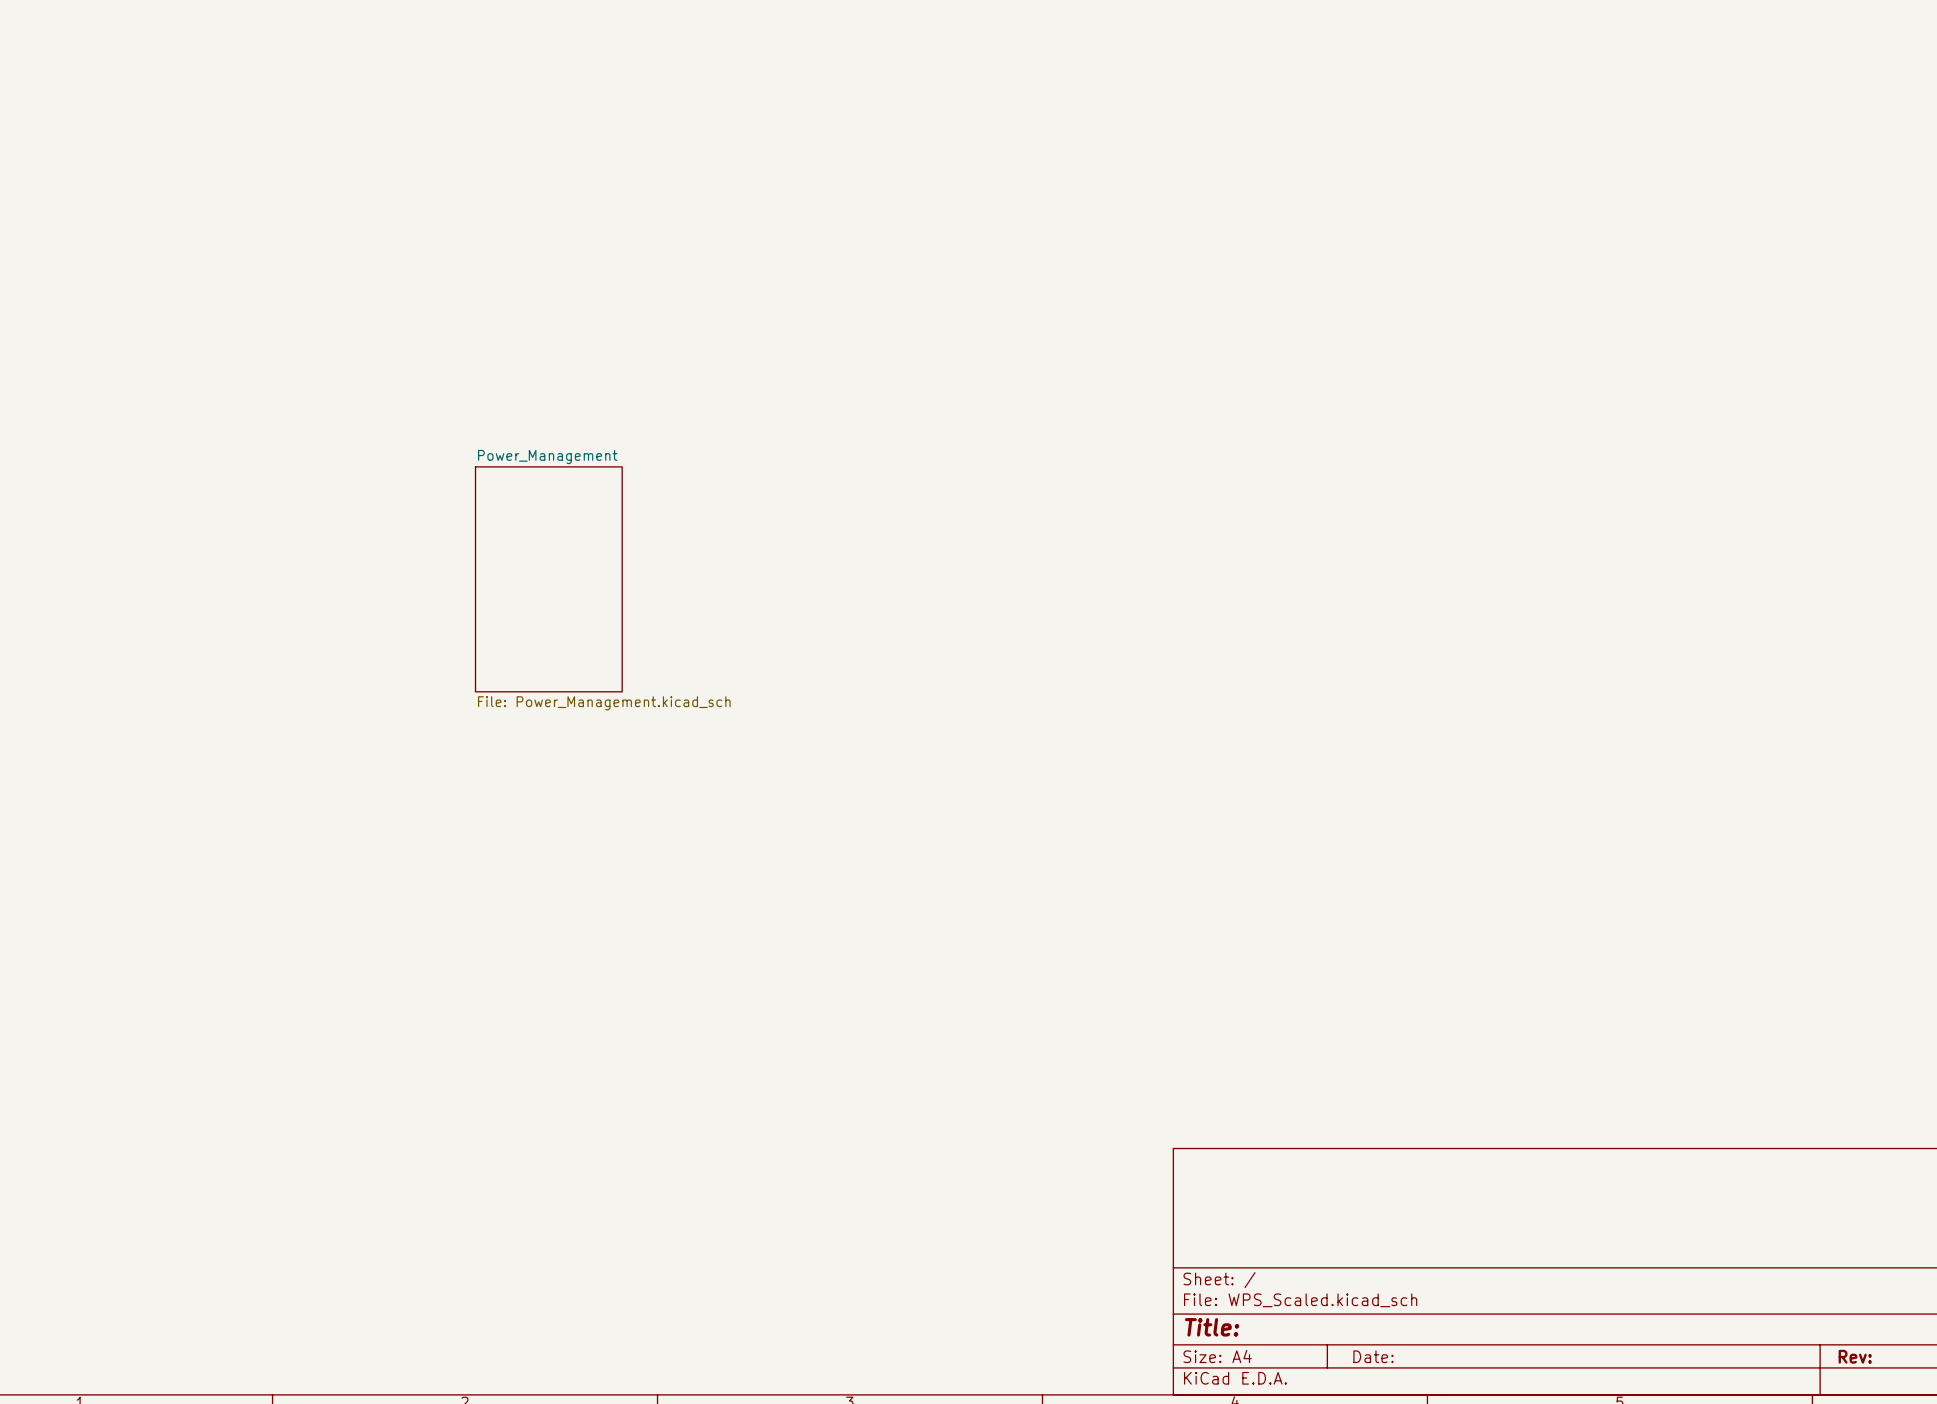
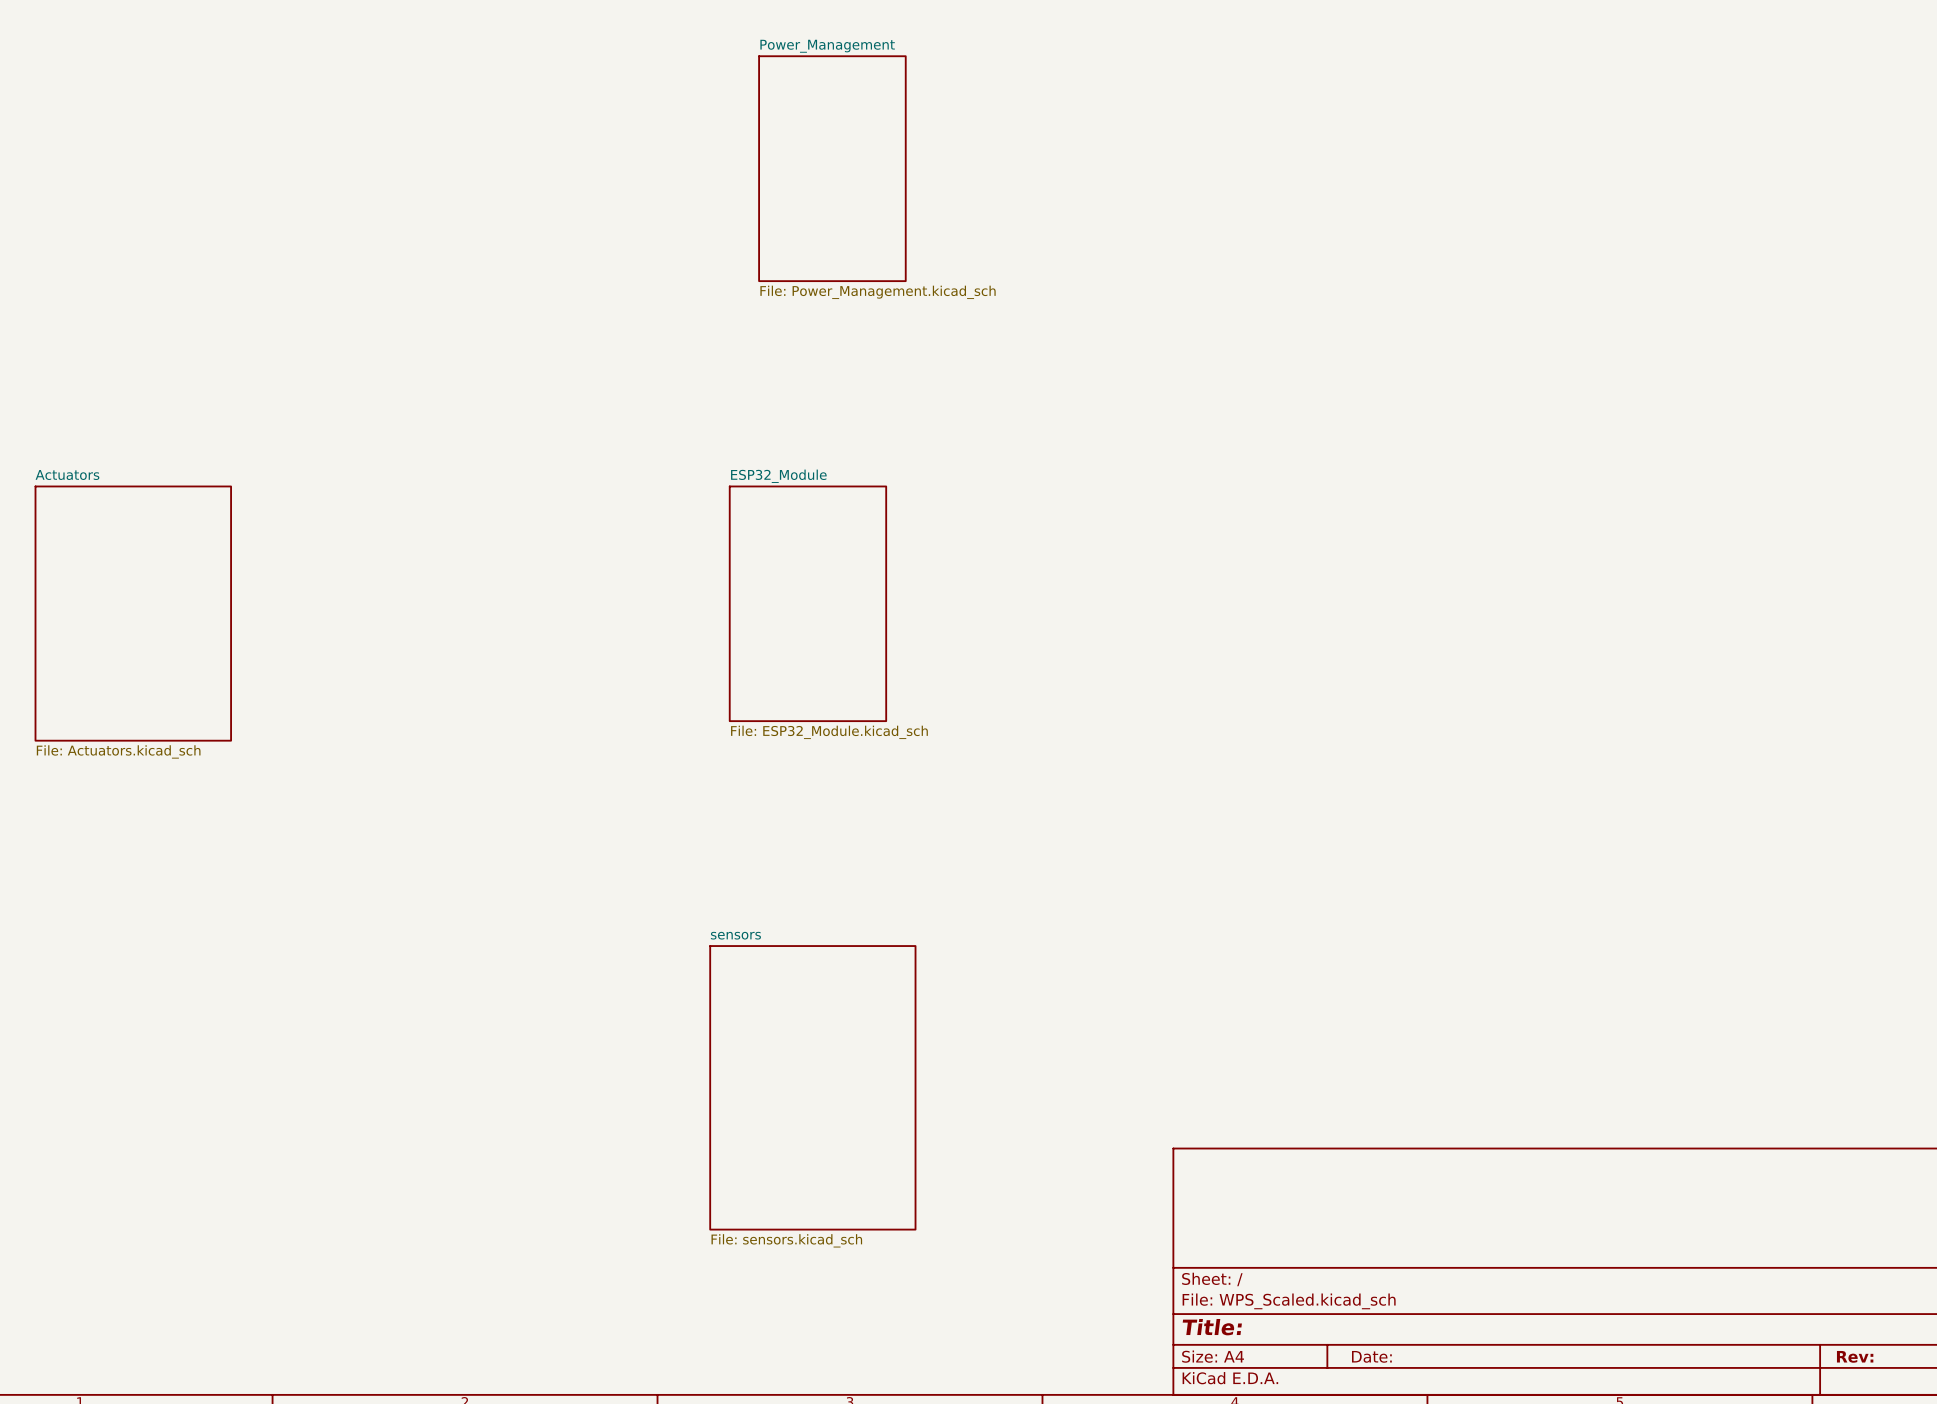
sheet Power_Management: none -> File: Power_Management.kicad_sch (832, 168)
sheet Power_Management: File: Power_Management.kicad_sch (548, 579) -> none
sheet ESP32_Module: none -> File: ESP32_Module.kicad_sch (807, 603)
sheet Actuators: none -> File: Actuators.kicad_sch (133, 613)
sheet sensors: none -> File: sensors.kicad_sch (812, 1087)

